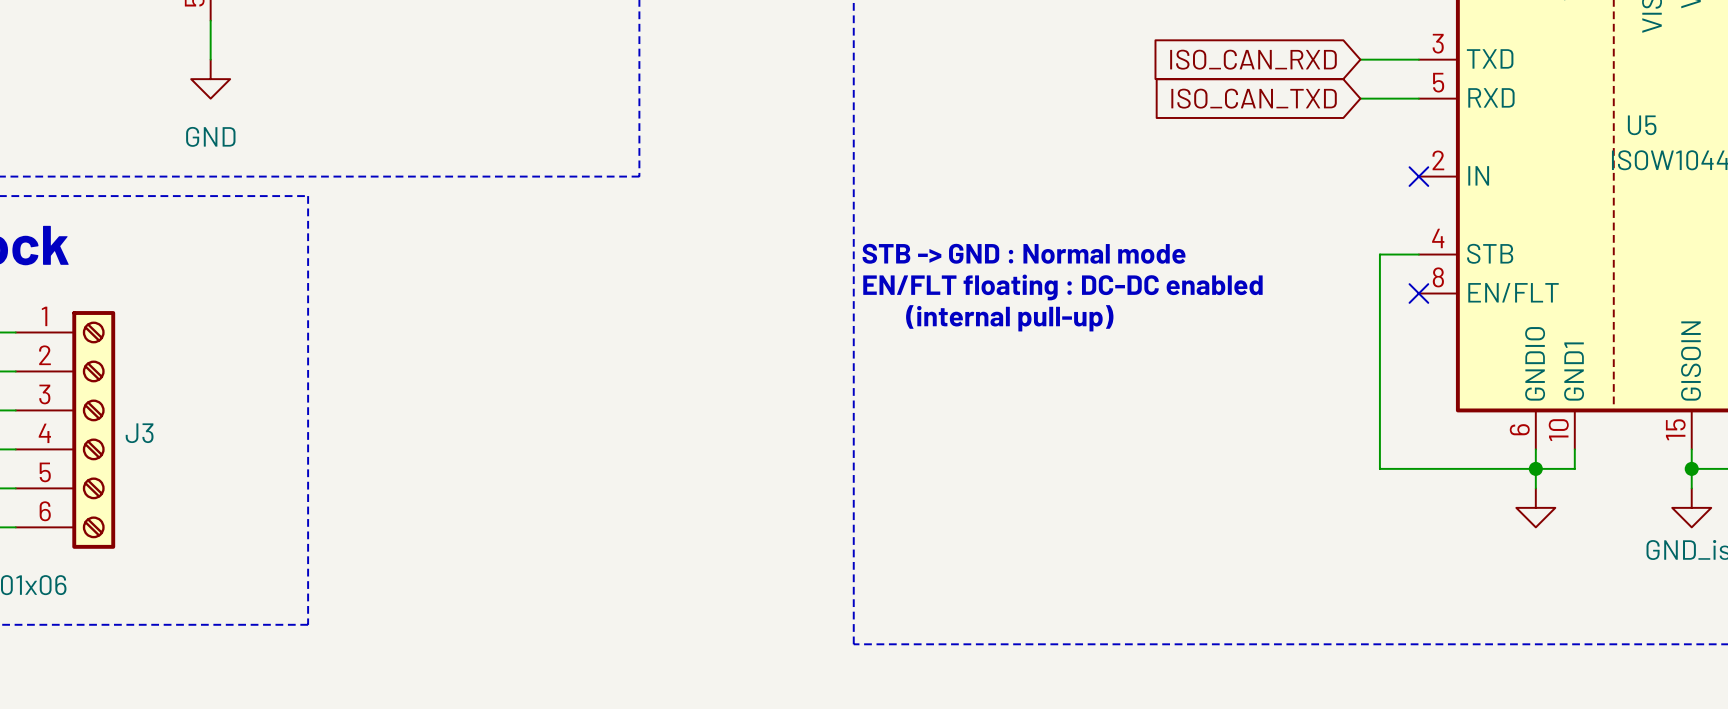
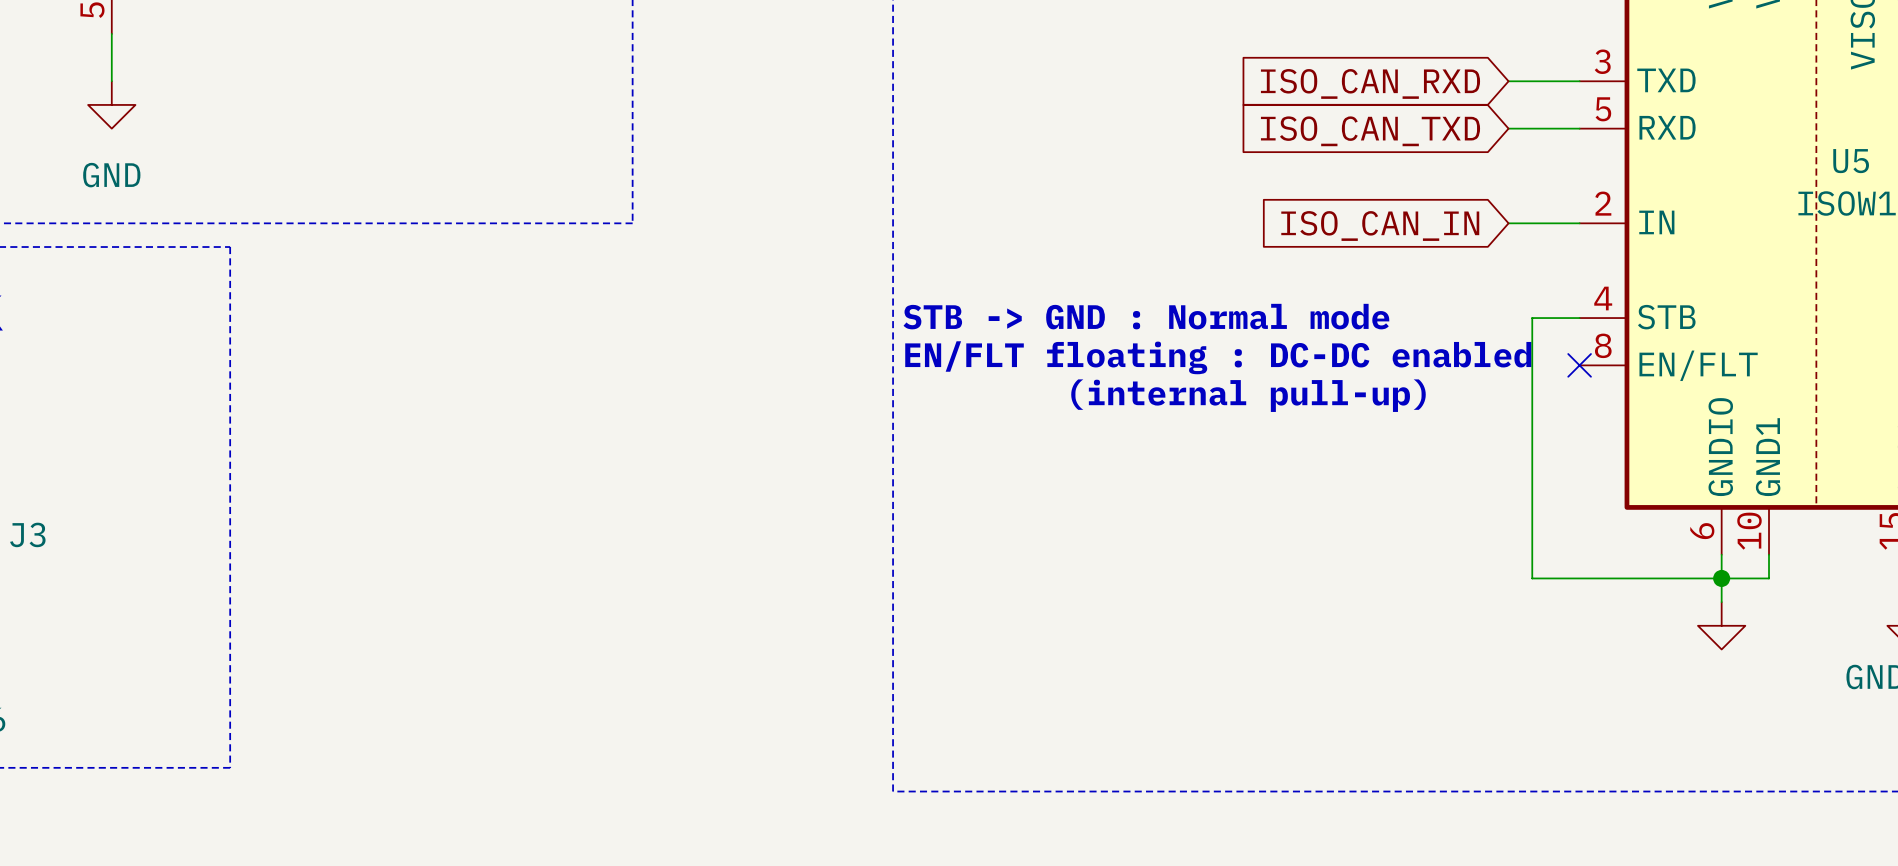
global label: none -> ISO_CAN_IN (1380, 225)
wire: none -> (1508, 223) (1579, 223)
no-connect mark: (1418, 176) -> none

